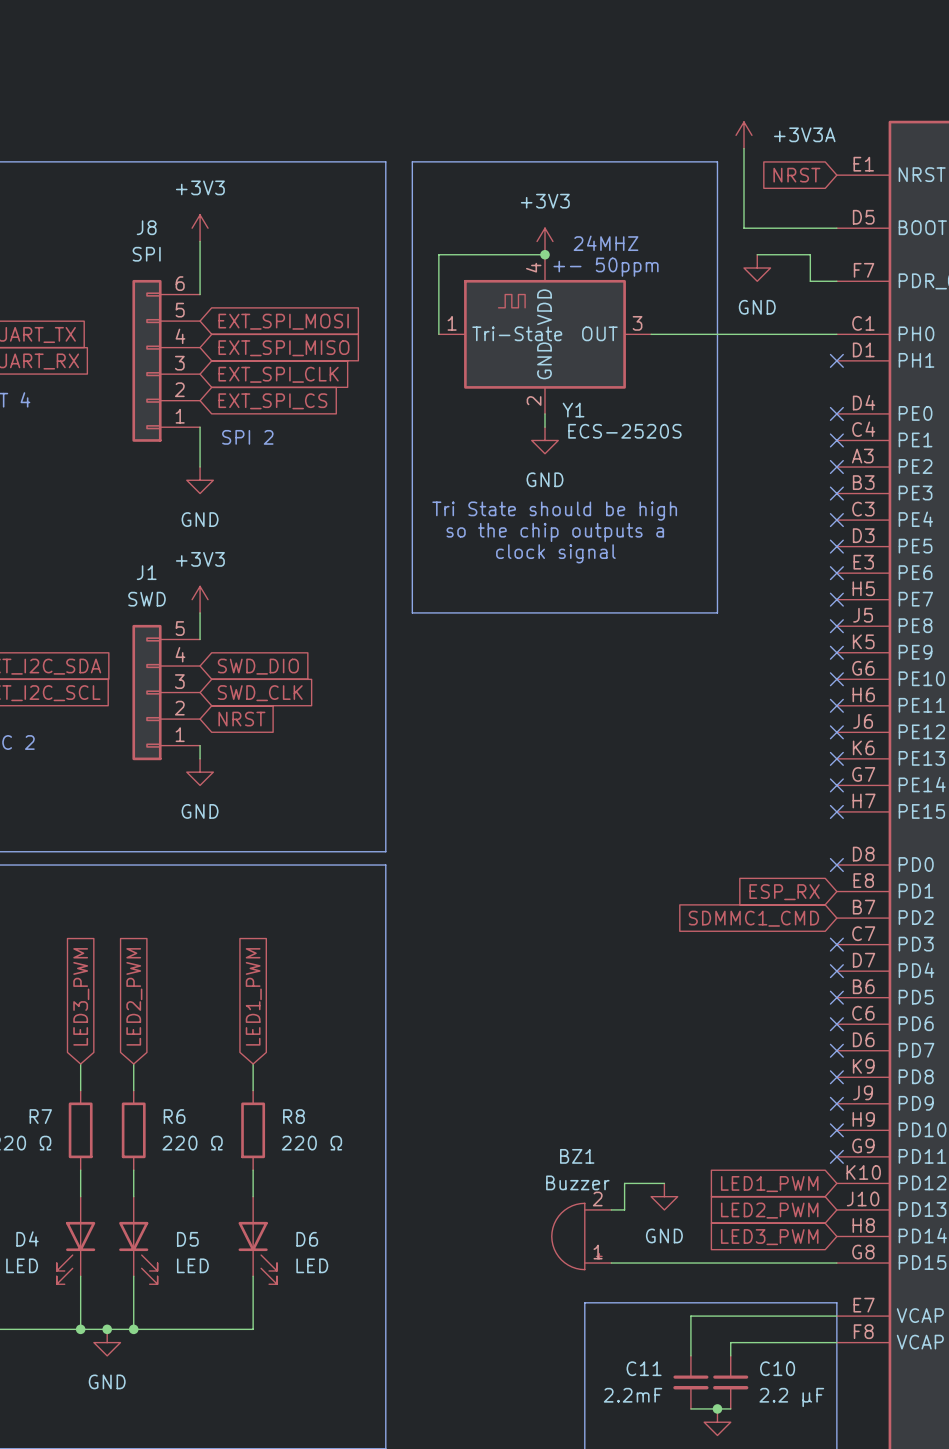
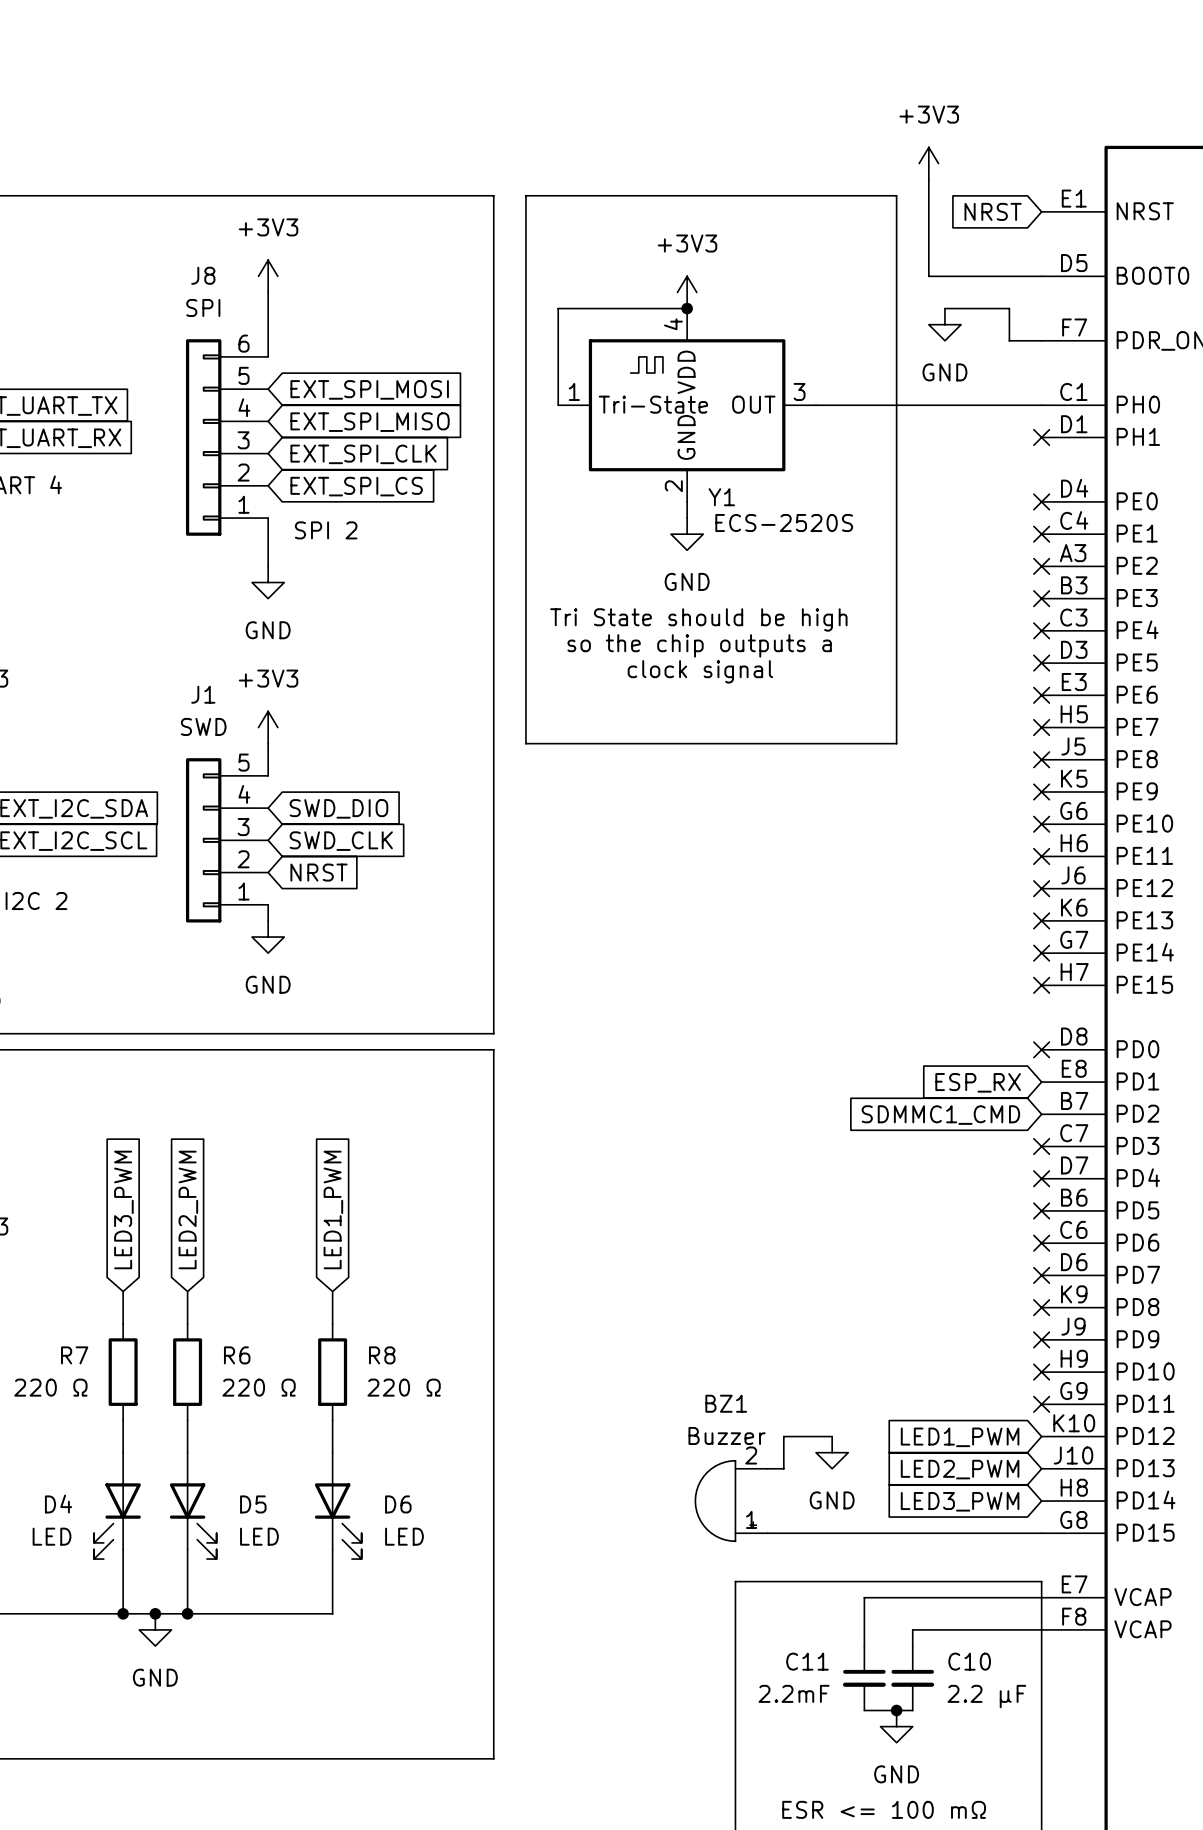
power symbol: +3V3A (744, 135) -> +3V3 (928, 163)
text: 24MHZ (606, 243) -> none
text: +- 50ppm (606, 267) -> none

